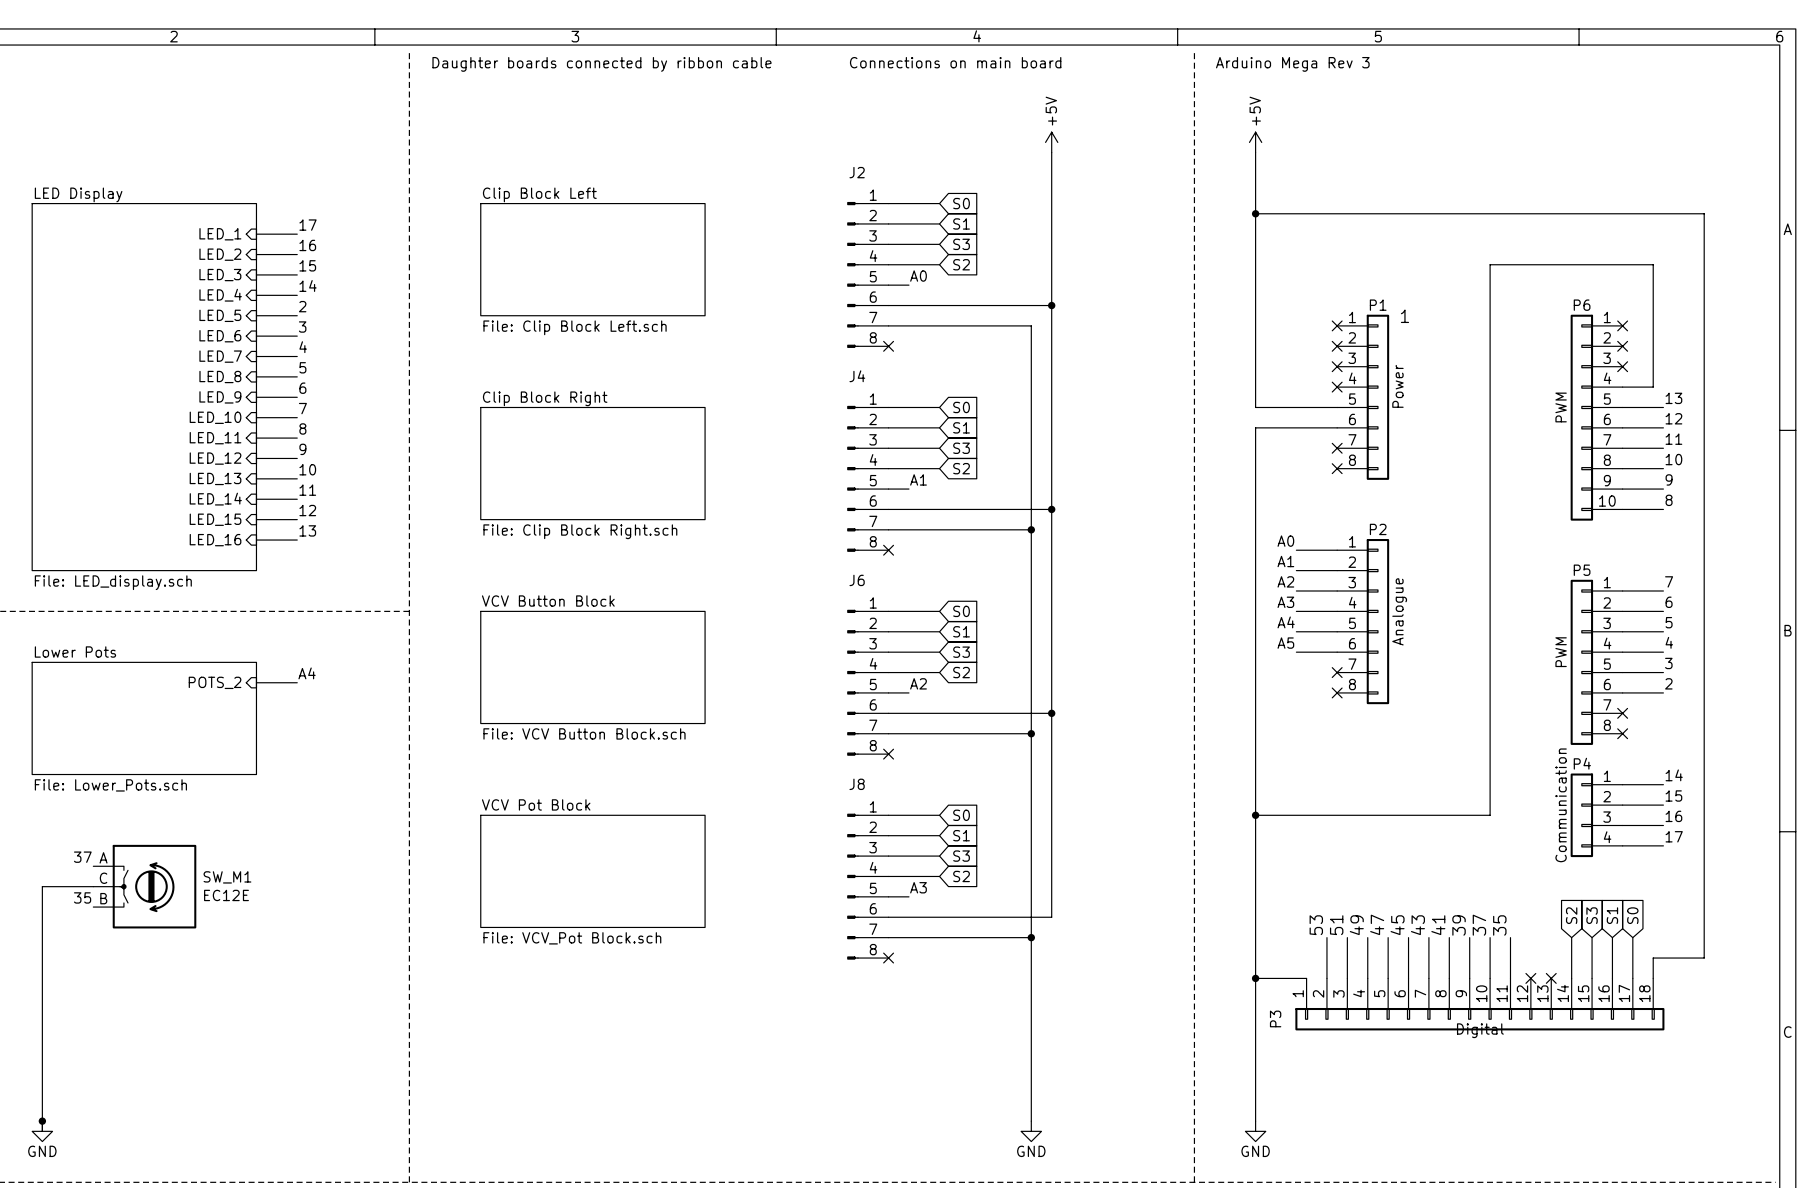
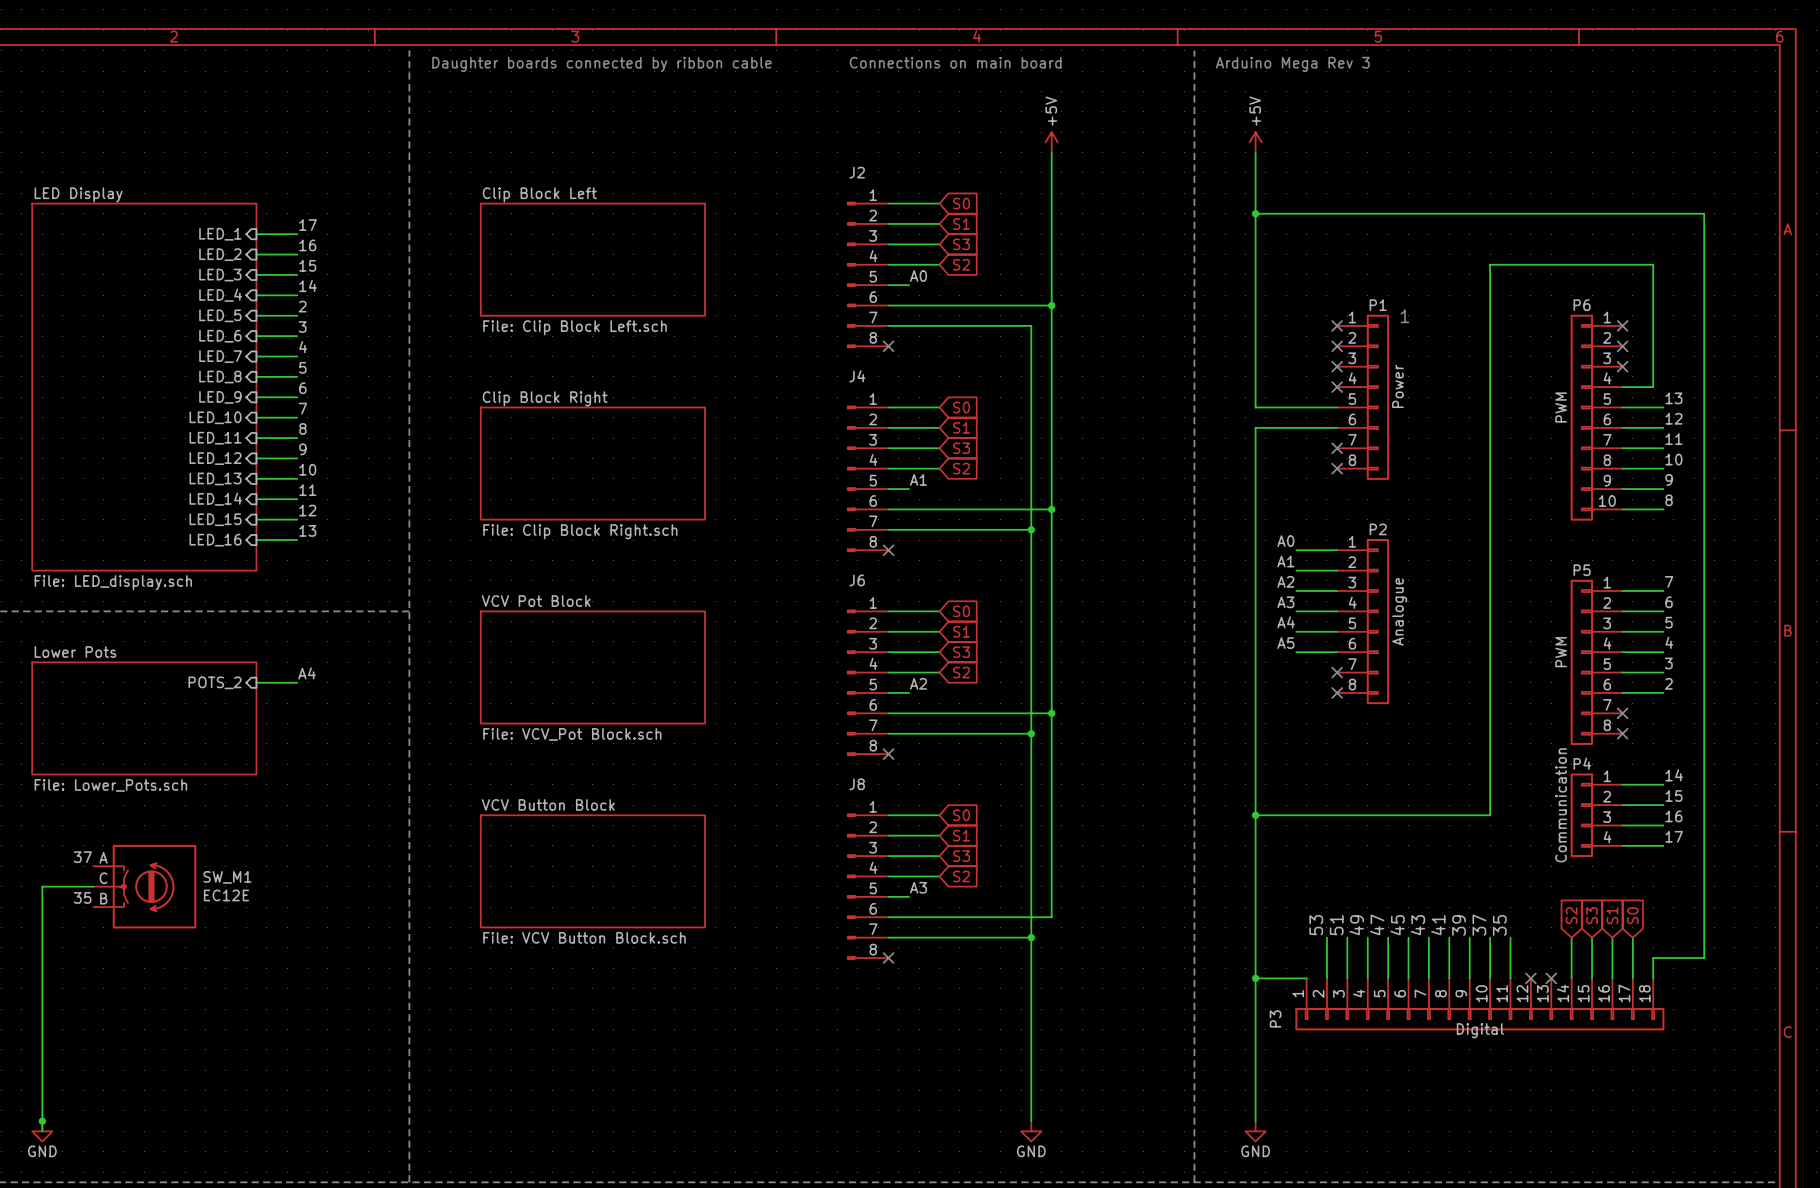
sheet VCV Button Block name: VCV Button Block (548, 601) -> VCV Pot Block (536, 601)
sheet VCV Button Block value: File: VCV Button Block.sch (584, 733) -> File: VCV_Pot Block.sch (572, 734)
sheet VCV Pot Block name: VCV Pot Block (536, 804) -> VCV Button Block (548, 804)
sheet VCV Pot Block value: File: VCV_Pot Block.sch (572, 938) -> File: VCV Button Block.sch (584, 937)

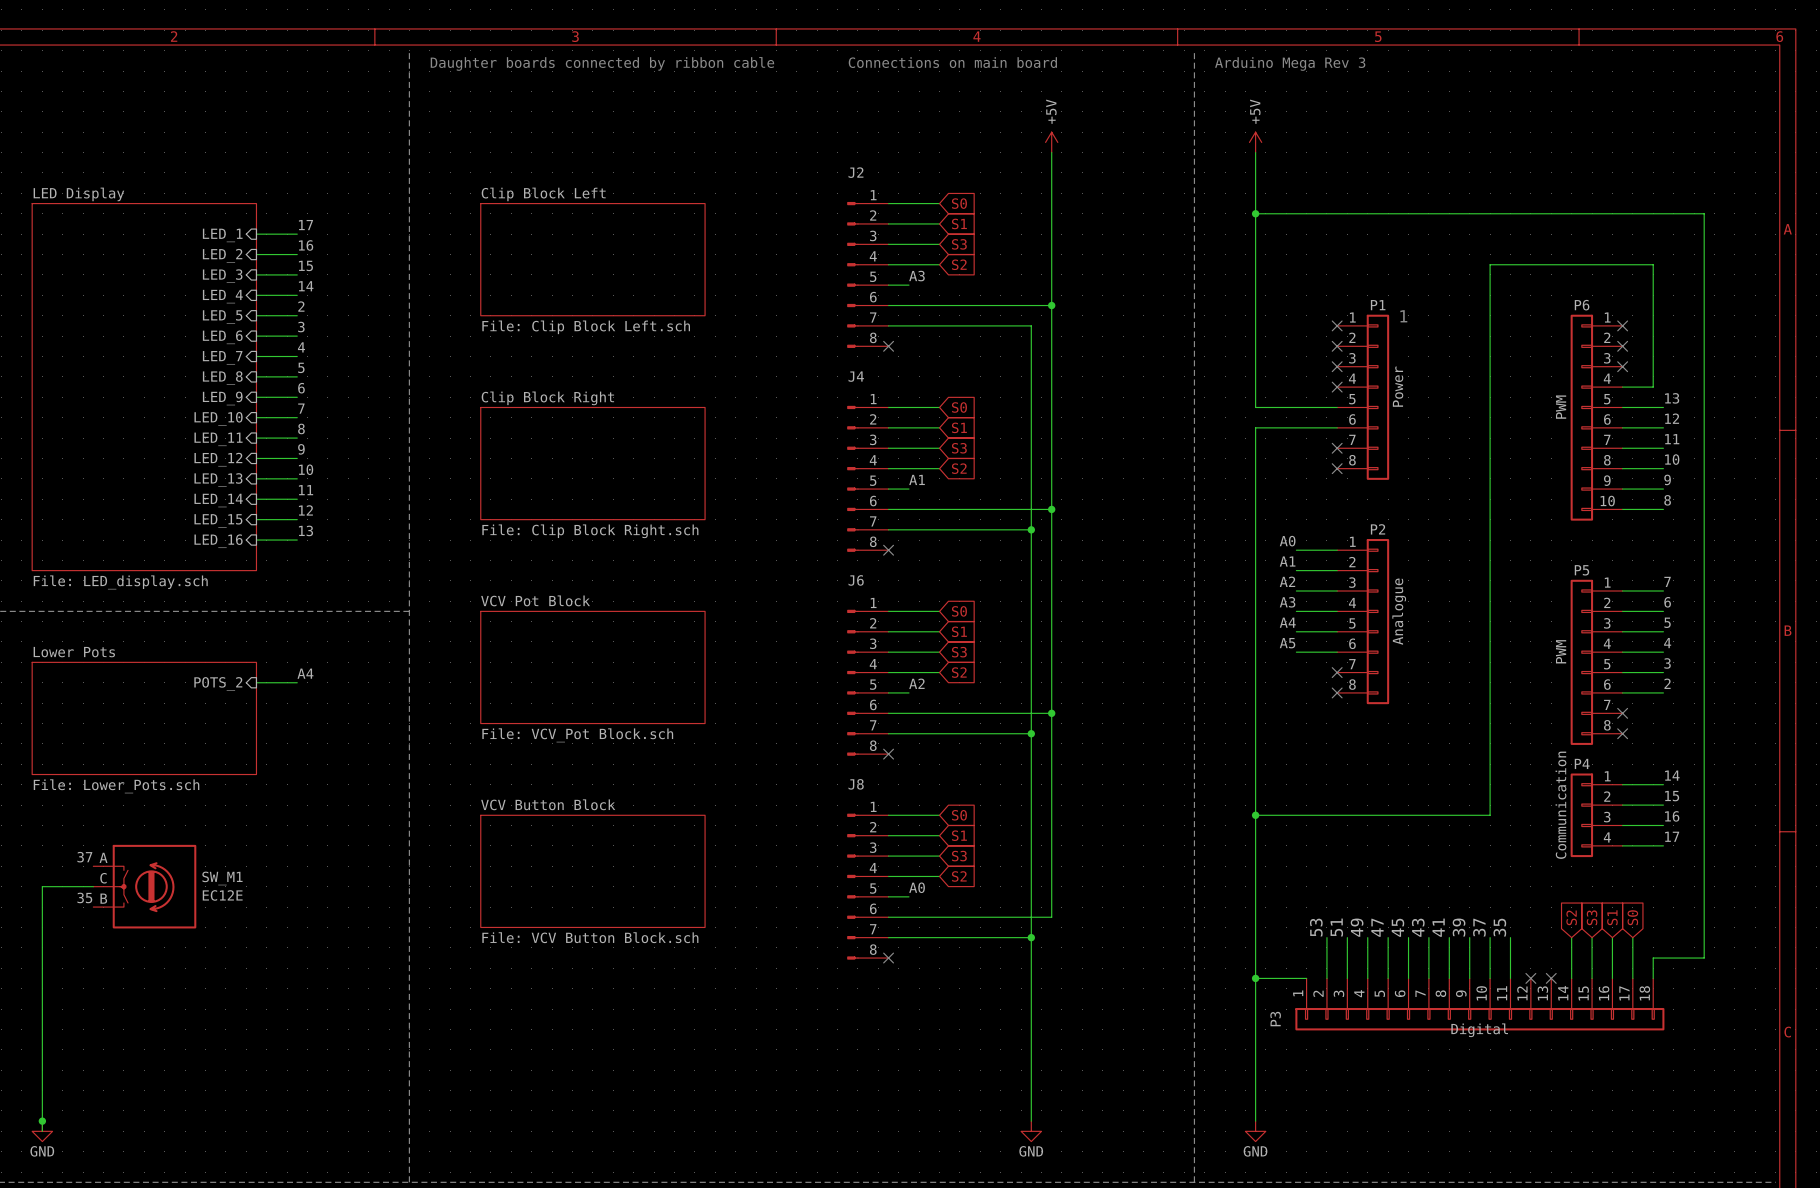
label: A0 (918, 276) -> A3 (916, 276)
label: A3 (918, 887) -> A0 (917, 887)

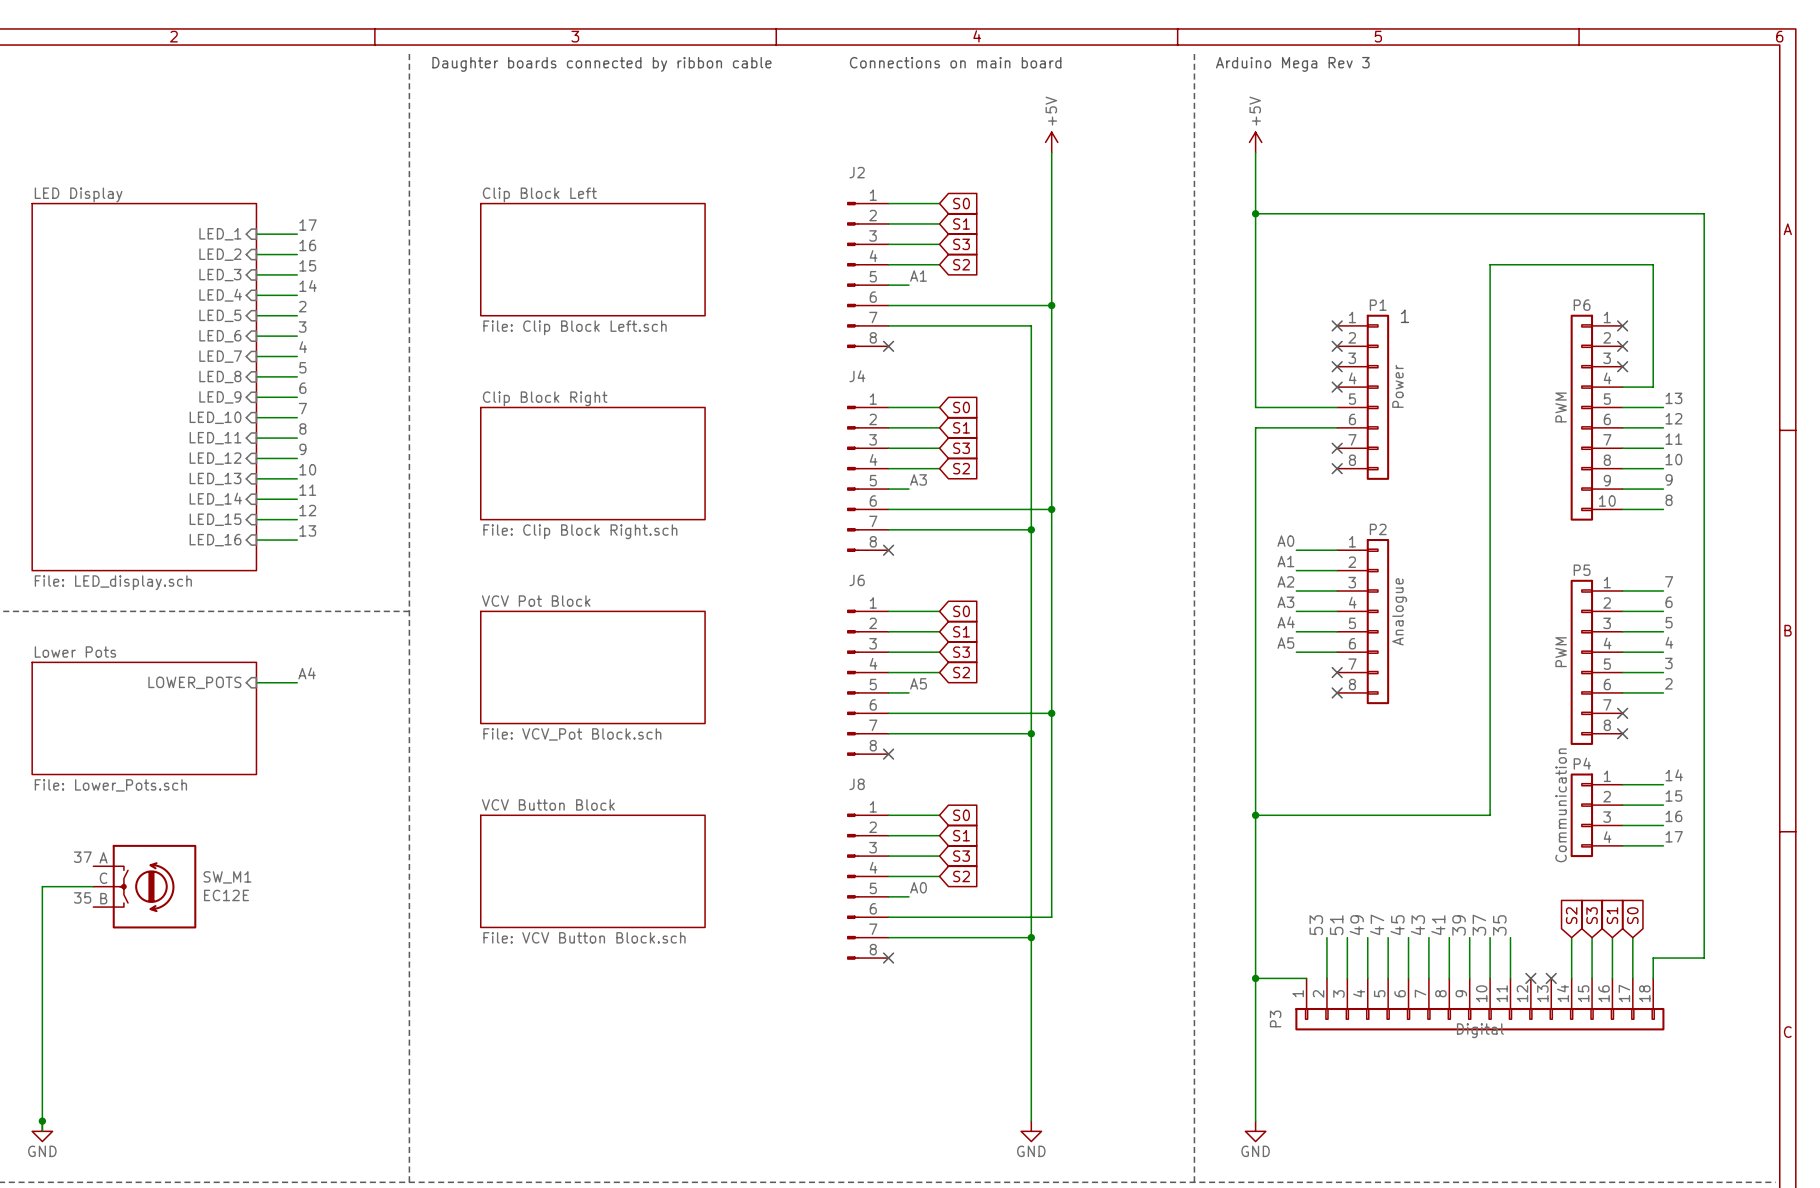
label: A3 (916, 276) -> A1 (918, 276)
label: A1 (917, 479) -> A3 (918, 479)
sheet pin: POTS_2 (218, 683) -> LOWER_POTS (194, 682)
label: A2 (916, 683) -> A5 (918, 683)

